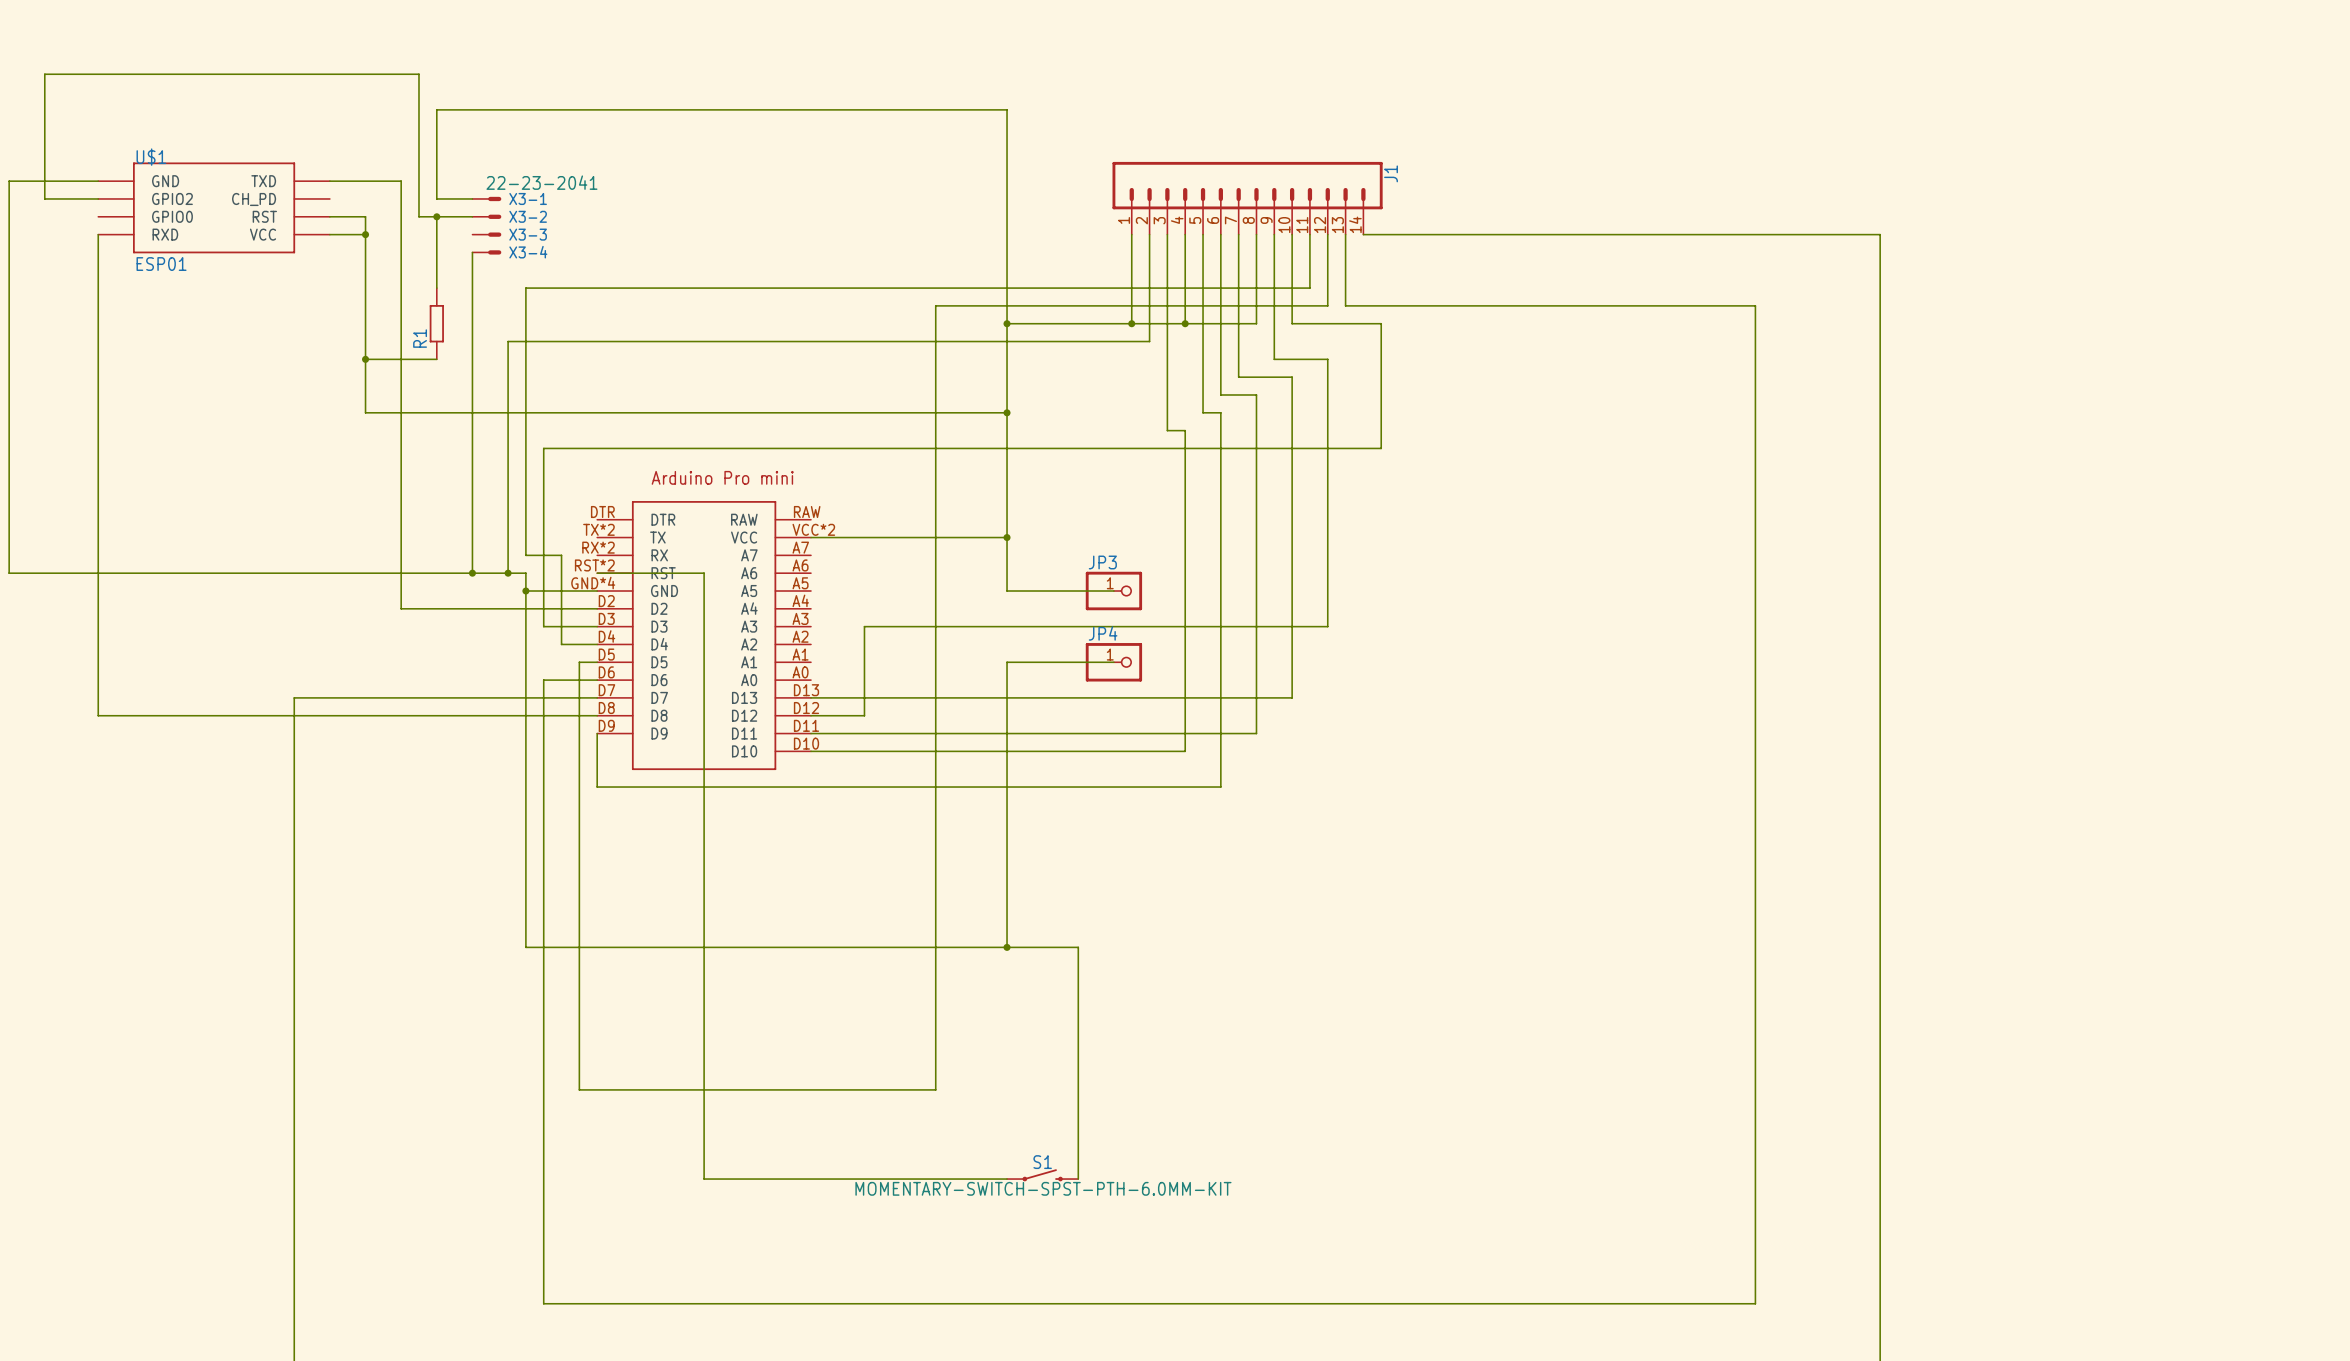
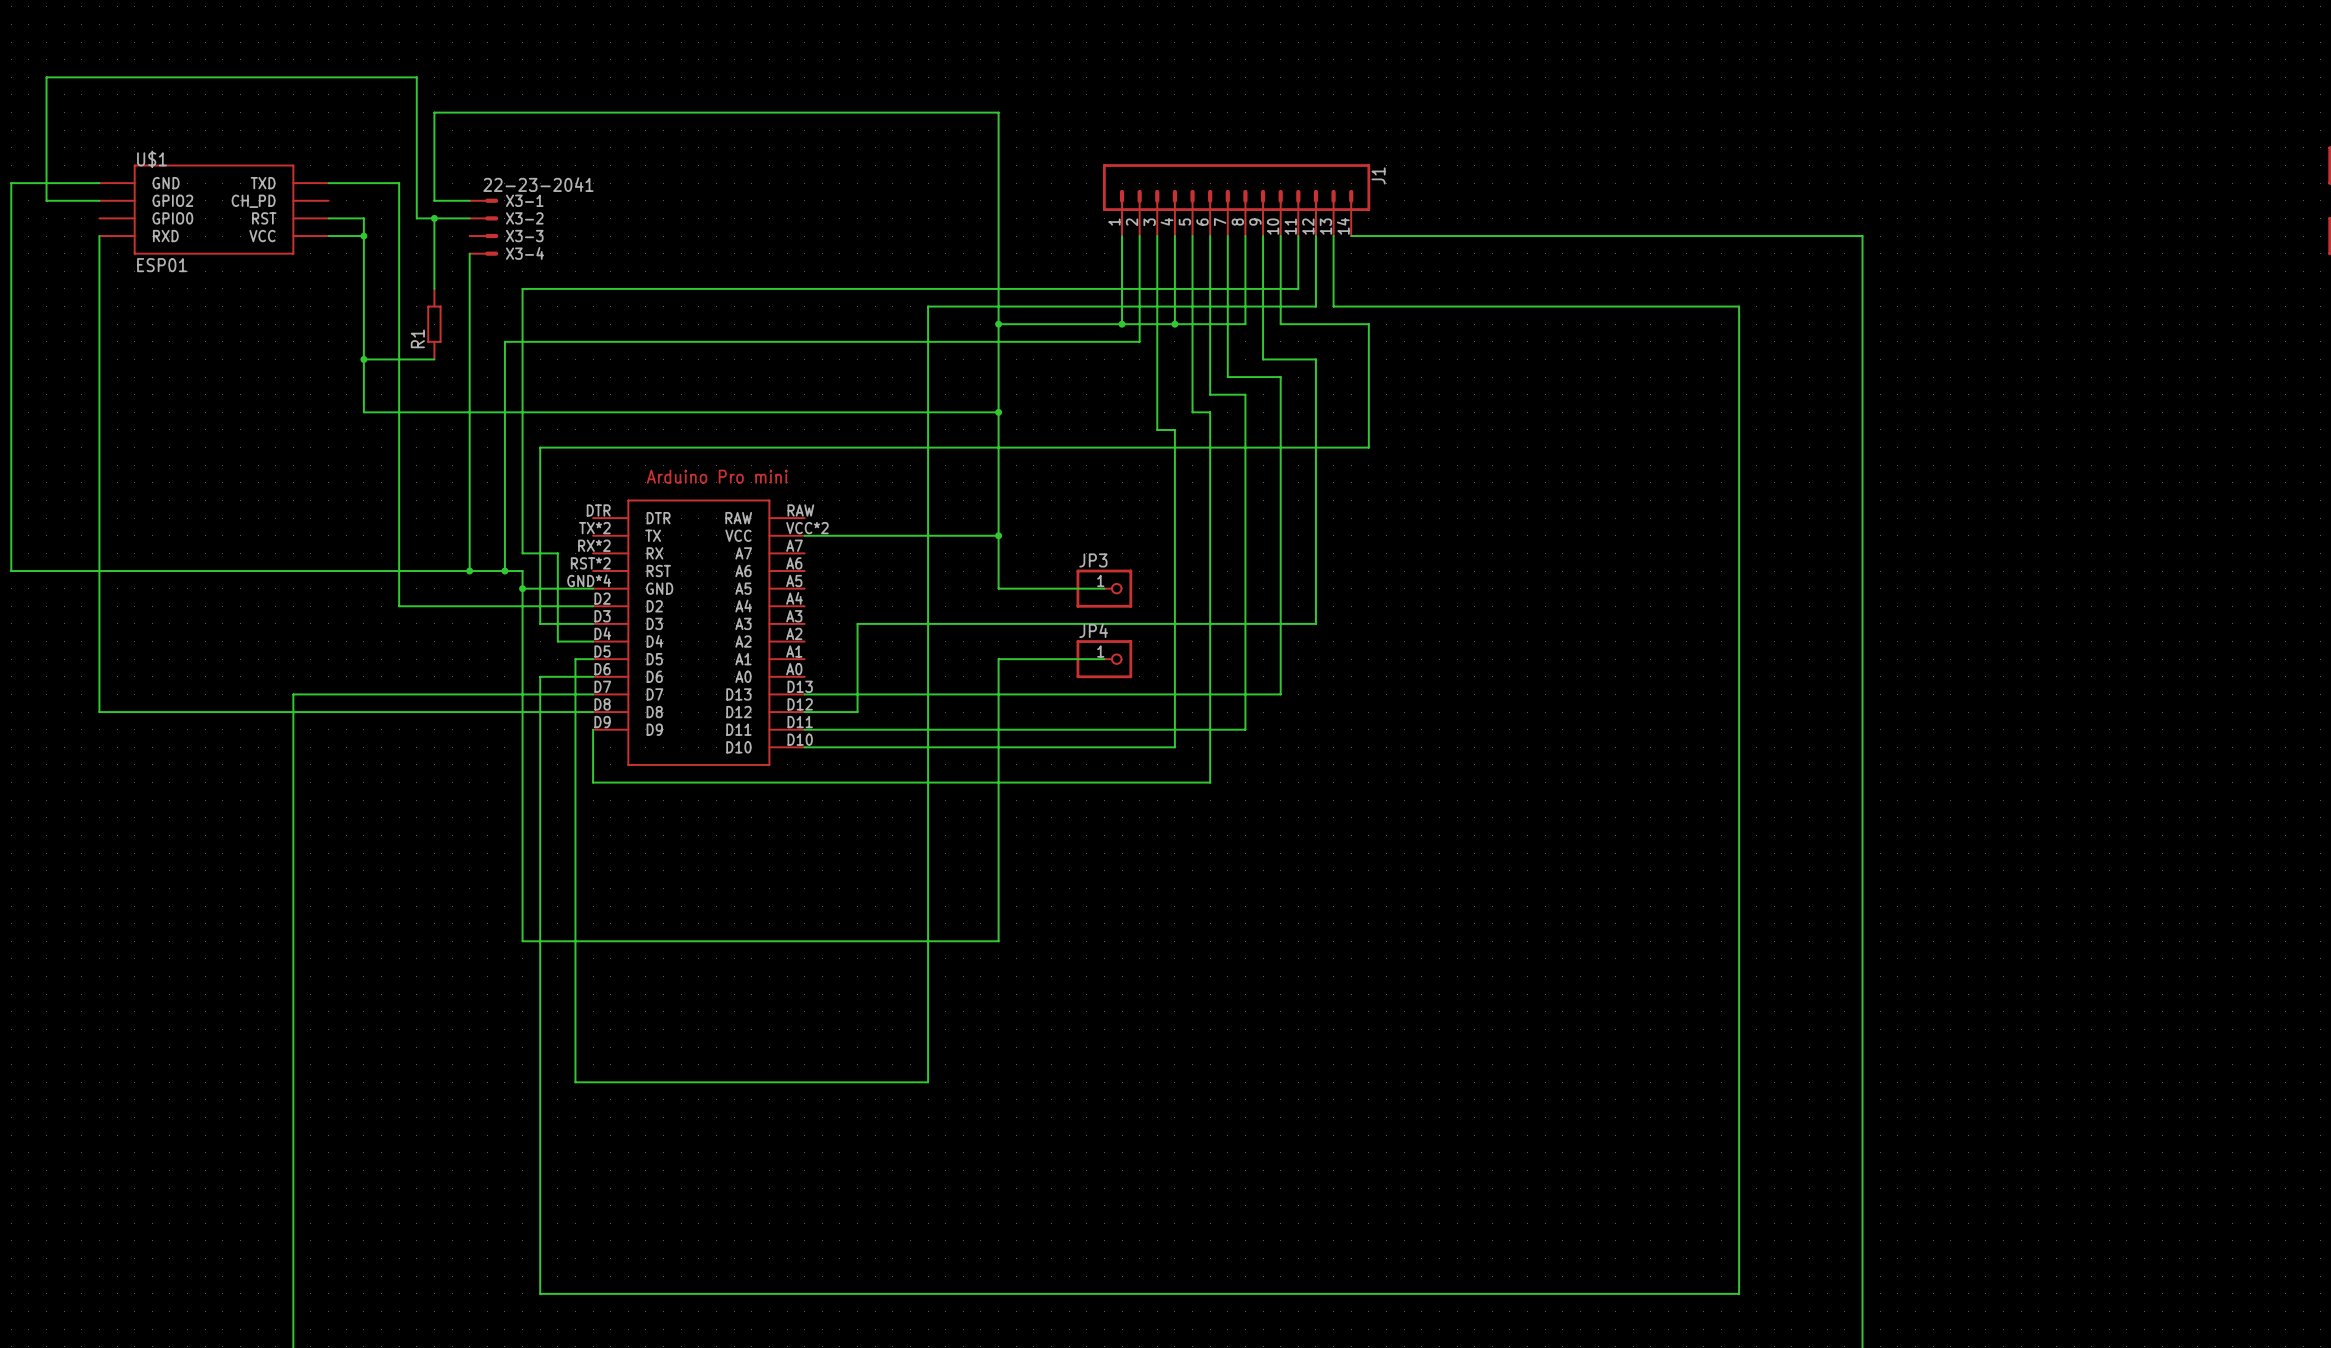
wire: (597, 573) (704, 573) (704, 1179) (1007, 1179) -> none
wire: (1007, 947) (1078, 947) (1078, 1179) -> none
junction: (1007, 947) -> none
S1: MOMENTARY-SWITCH-SPST-PTH-6.0MM-KIT (1042, 1175) -> none

